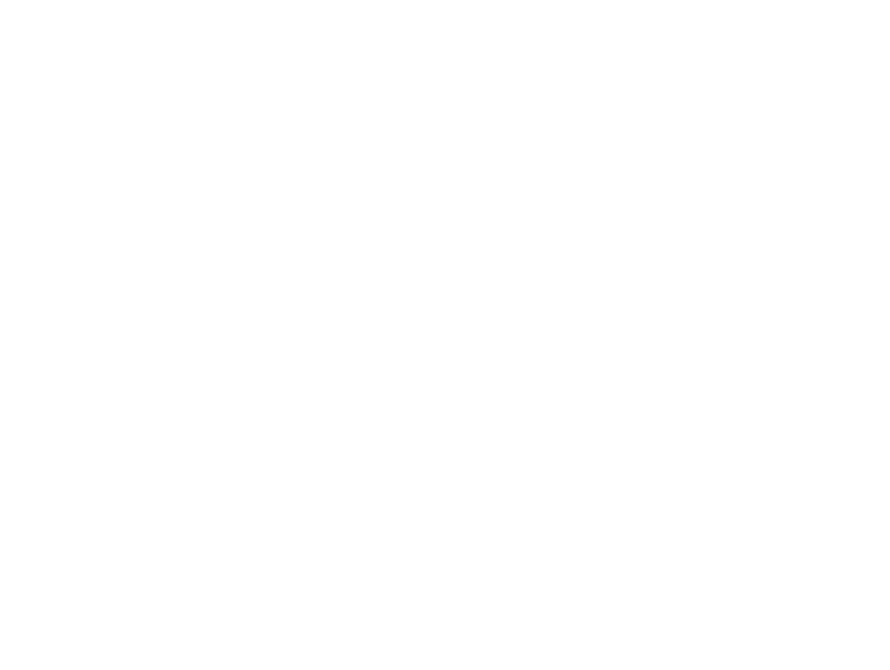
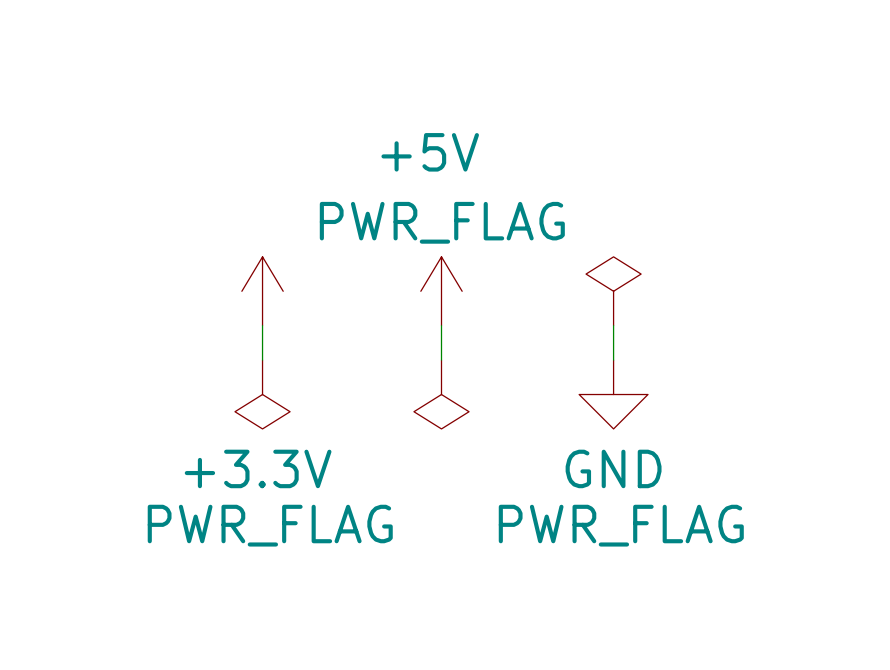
power symbol: none -> +3.3V (262, 291)
power symbol: none -> +5V (441, 291)
power symbol: none -> PWR_FLAG (613, 291)
wire: none -> (262, 325) (262, 360)
wire: none -> (441, 325) (441, 360)
wire: none -> (613, 325) (613, 360)
power symbol: none -> PWR_FLAG (262, 394)
power symbol: none -> PWR_FLAG (441, 394)
power symbol: none -> GND (613, 394)

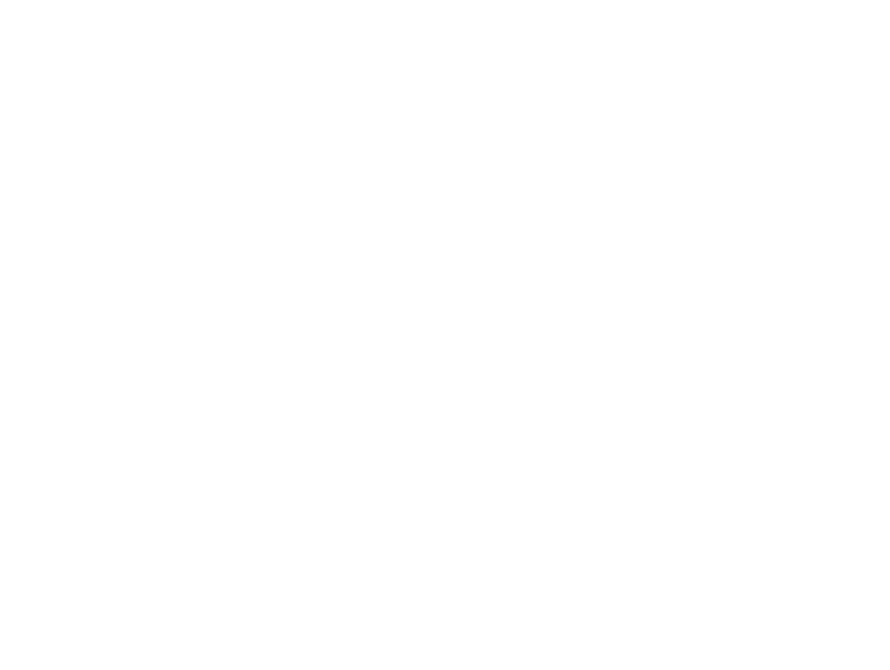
power symbol: +3.3V (262, 291) -> none
power symbol: +5V (441, 291) -> none
power symbol: PWR_FLAG (613, 291) -> none
wire: (262, 325) (262, 360) -> none
wire: (441, 325) (441, 360) -> none
wire: (613, 325) (613, 360) -> none
power symbol: PWR_FLAG (262, 394) -> none
power symbol: PWR_FLAG (441, 394) -> none
power symbol: GND (613, 394) -> none

